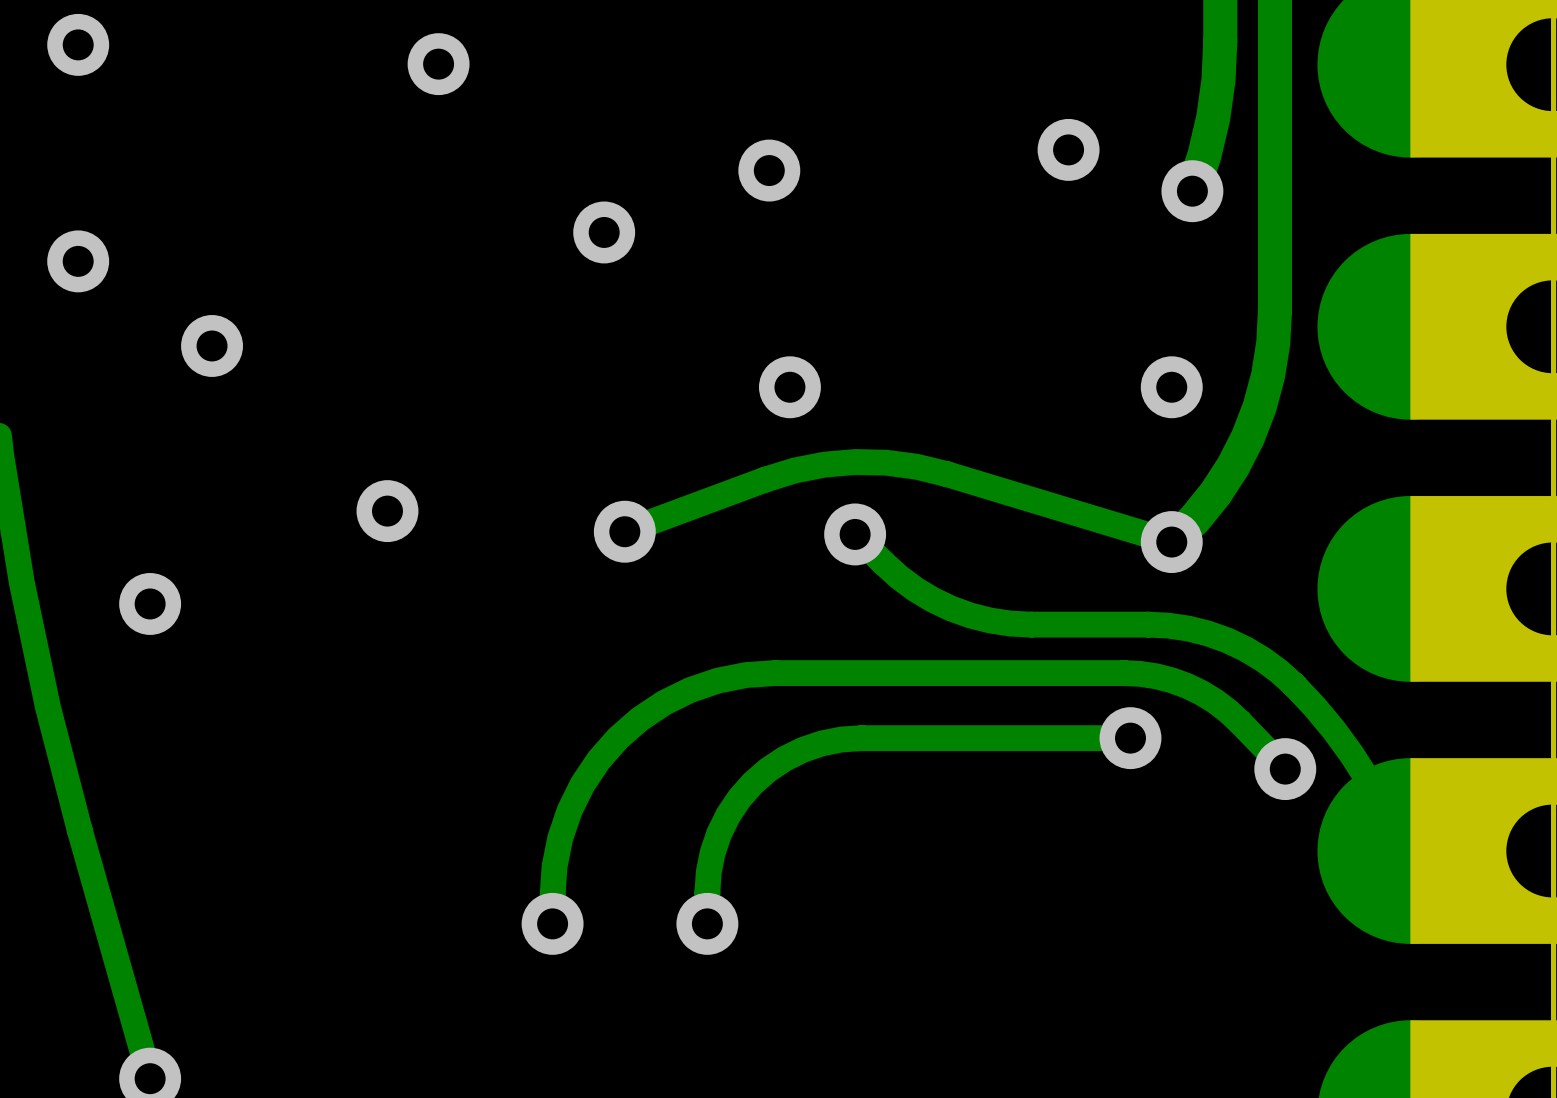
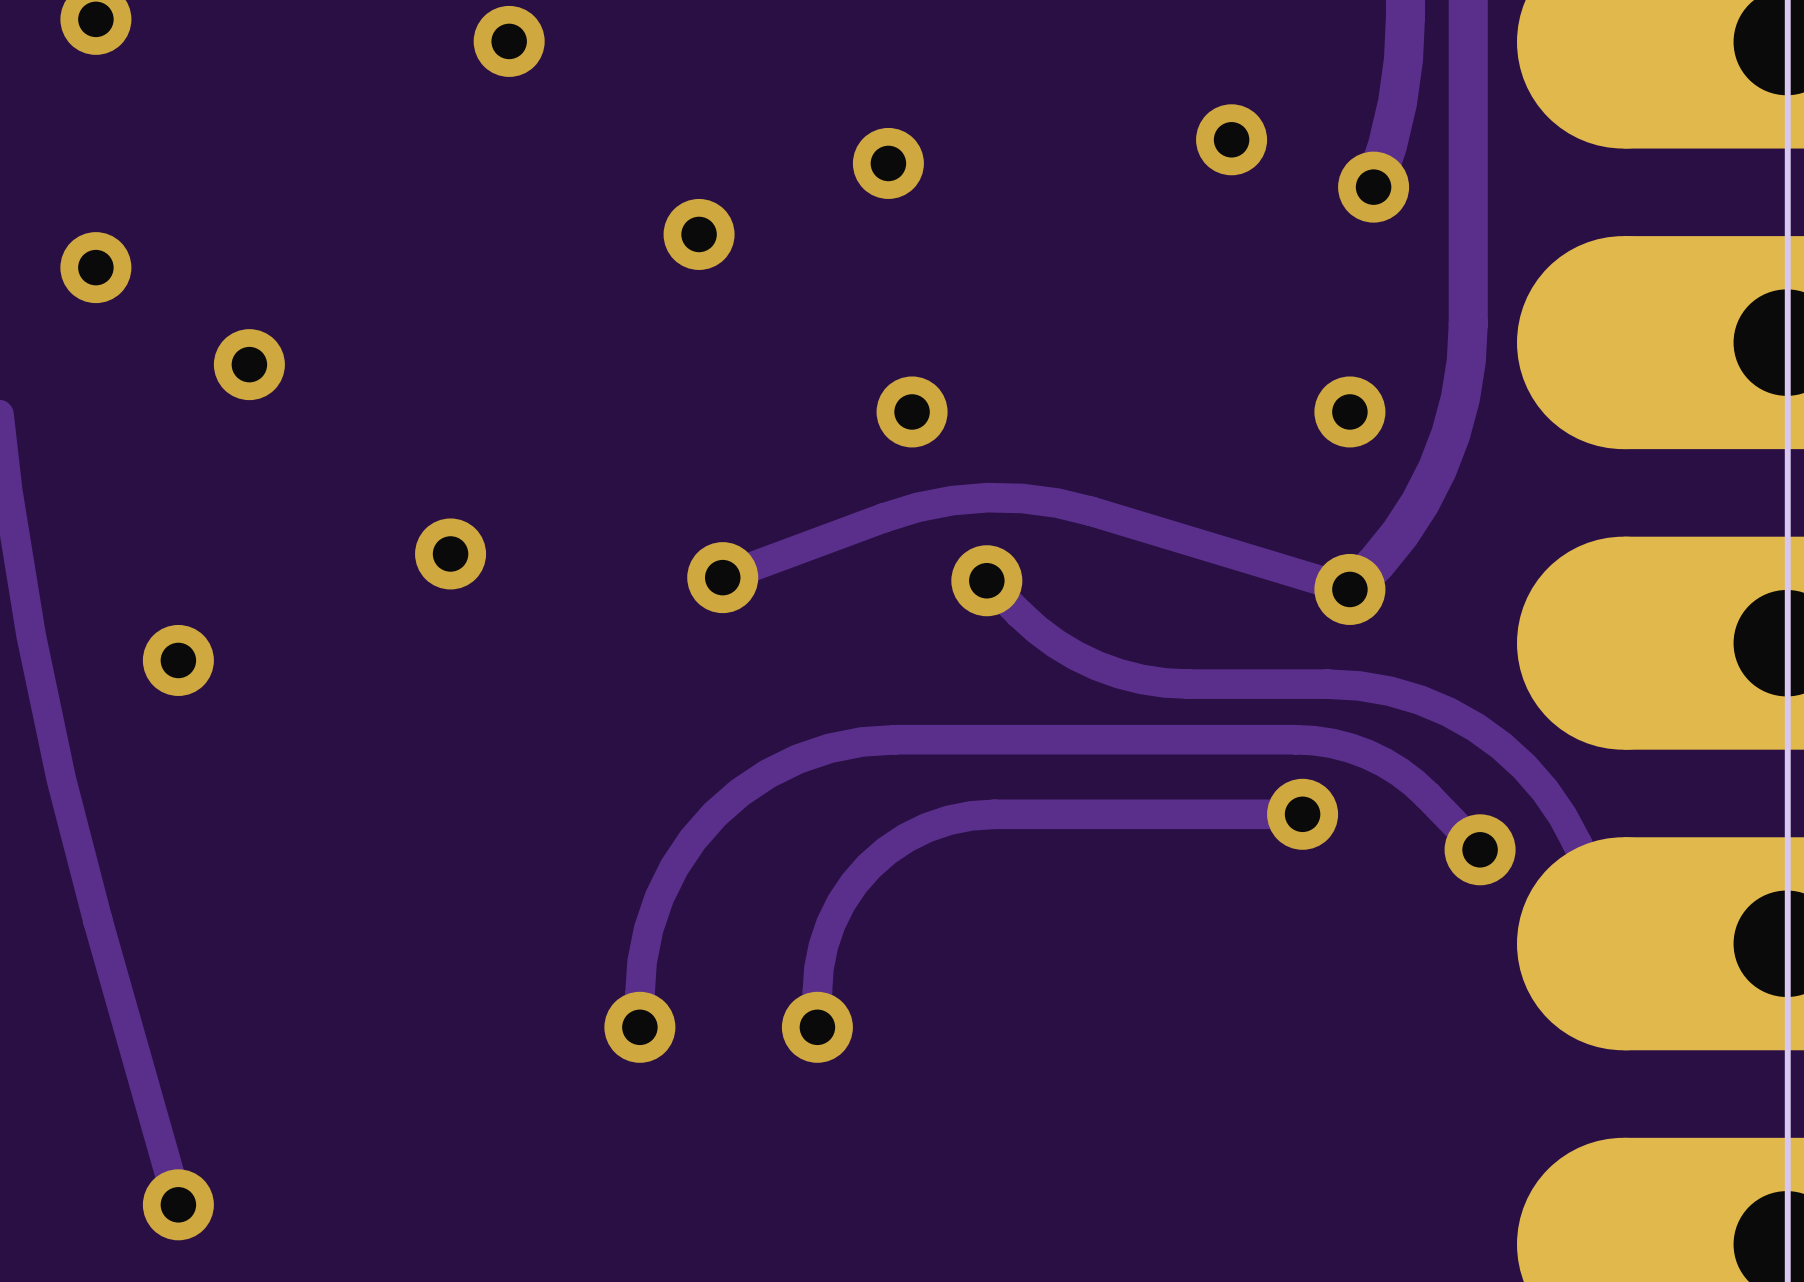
track: (1148, 624) (1188, 628) (1227, 640) (1245, 649) (1279, 671) (1314, 707) (1333, 730) (1367, 779) (1410, 851) -> (1322, 684) (1359, 685) (1389, 691) (1419, 700) (1448, 712) (1476, 727) (1501, 745) (1524, 766) (1544, 790) (1562, 816) (1623, 943)

